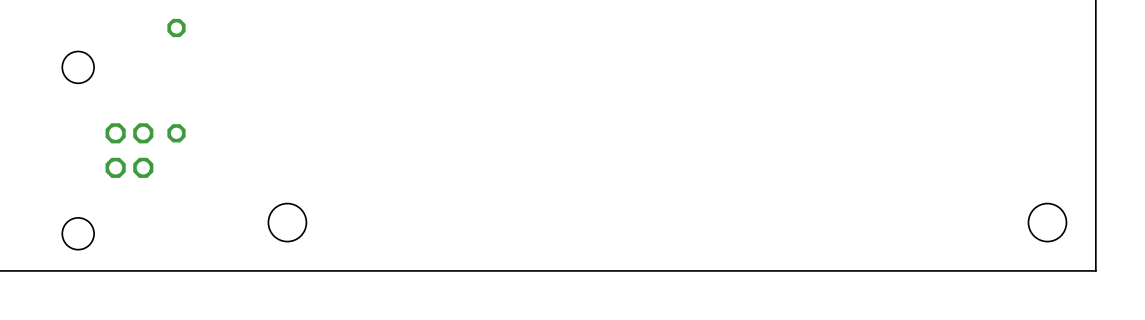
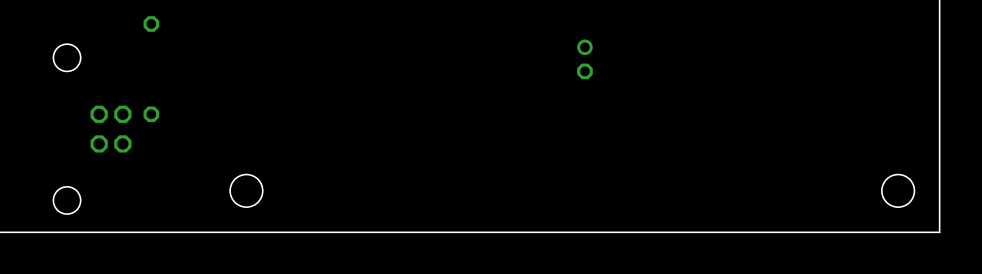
part: none -> (584, 59)

